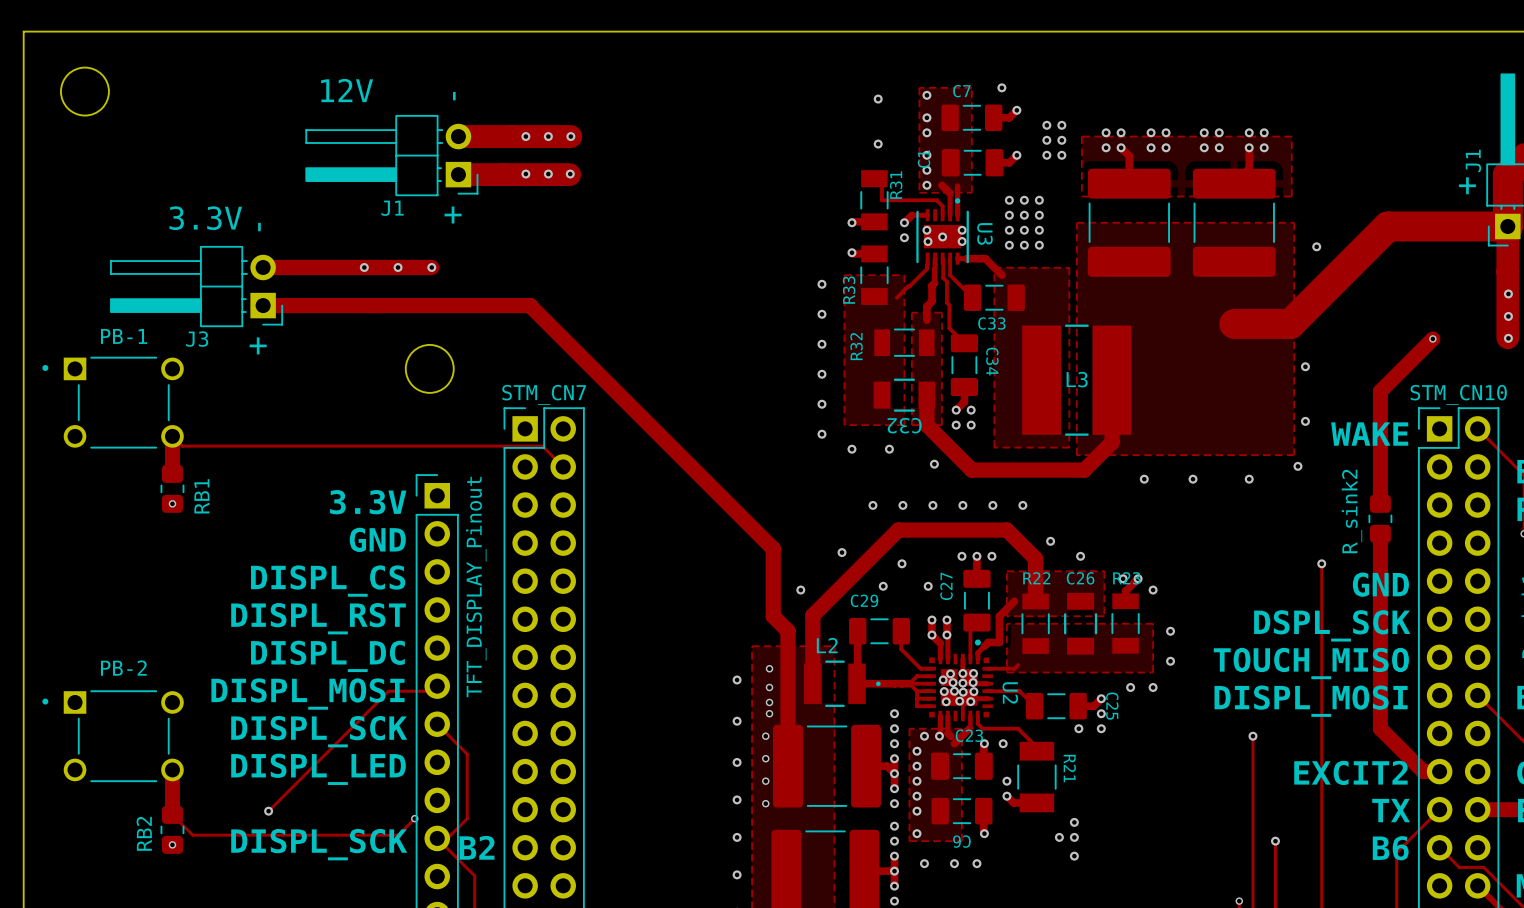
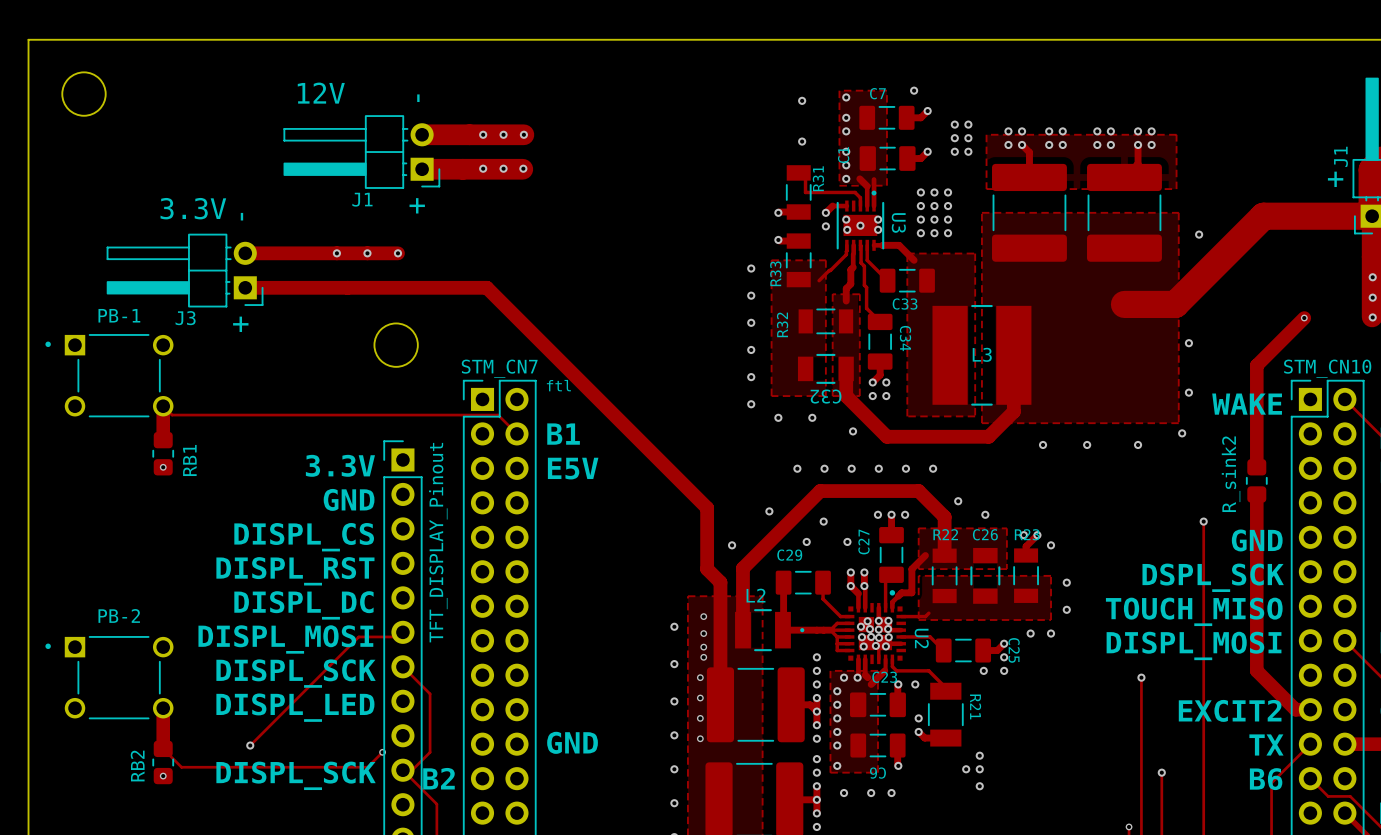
text: none -> ftl (558, 385)
text: none -> B1 (563, 434)
text: none -> E5V (573, 468)
text: none -> GND (572, 742)

